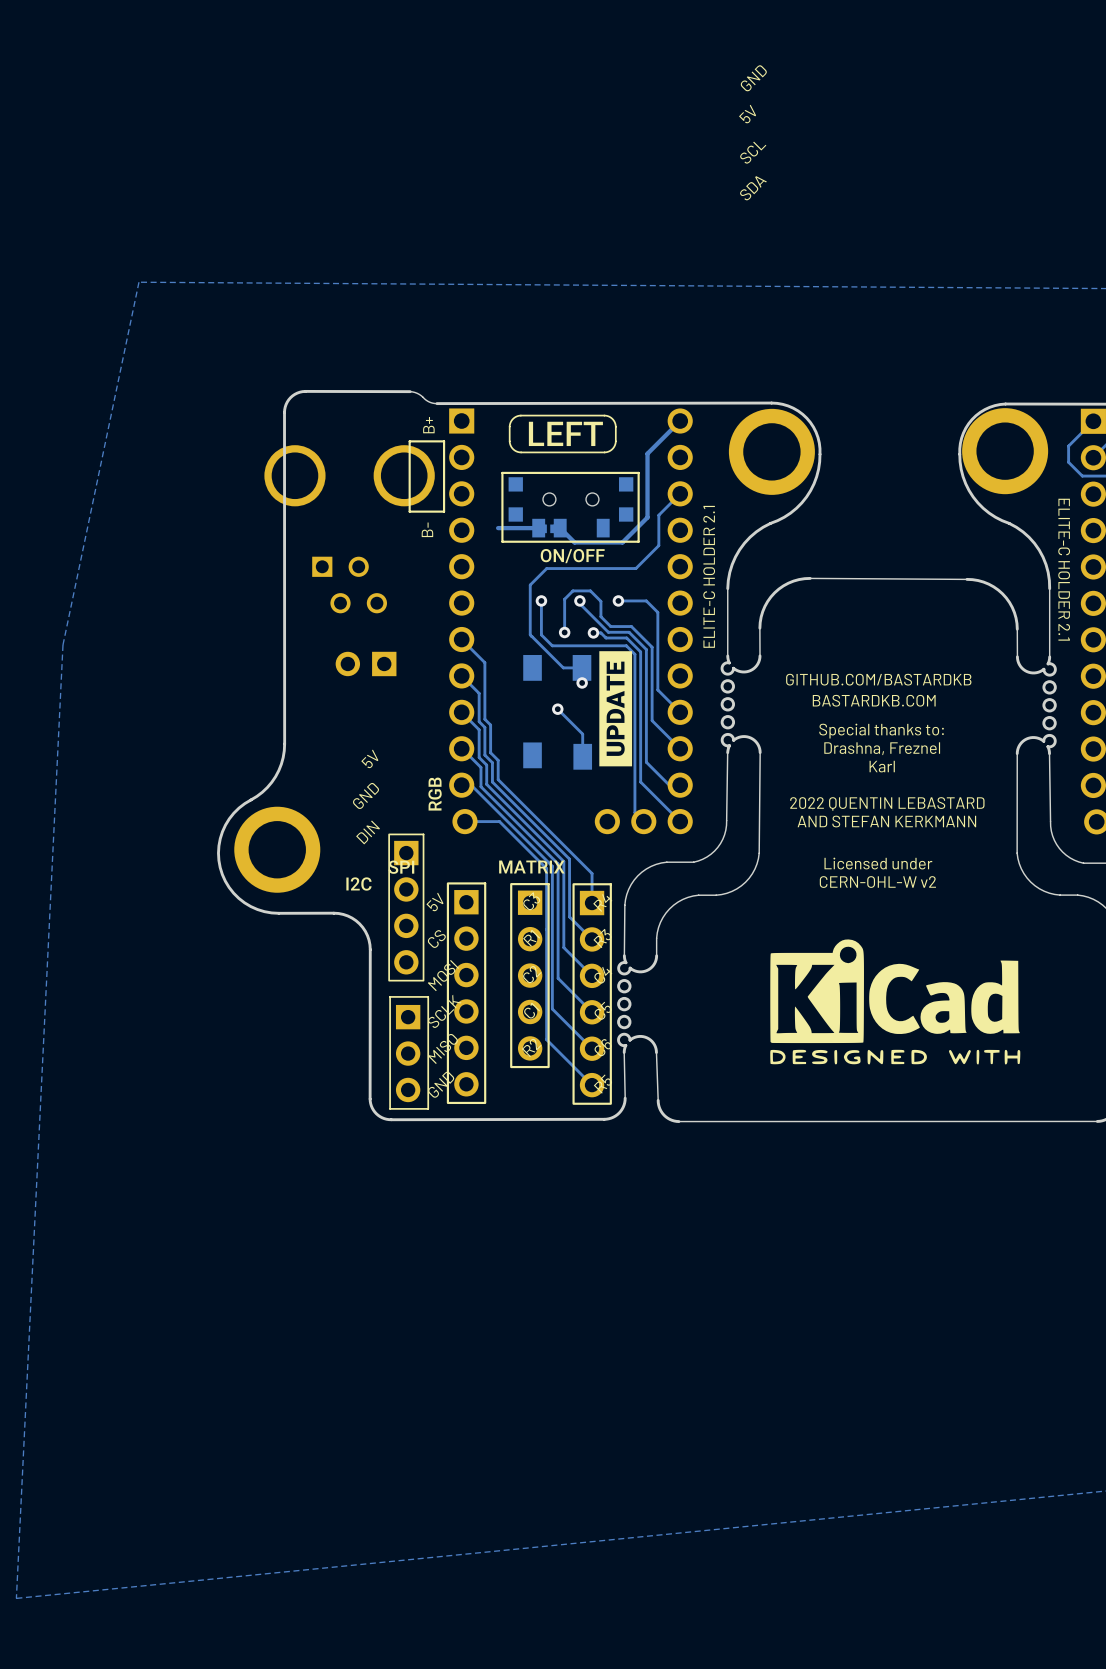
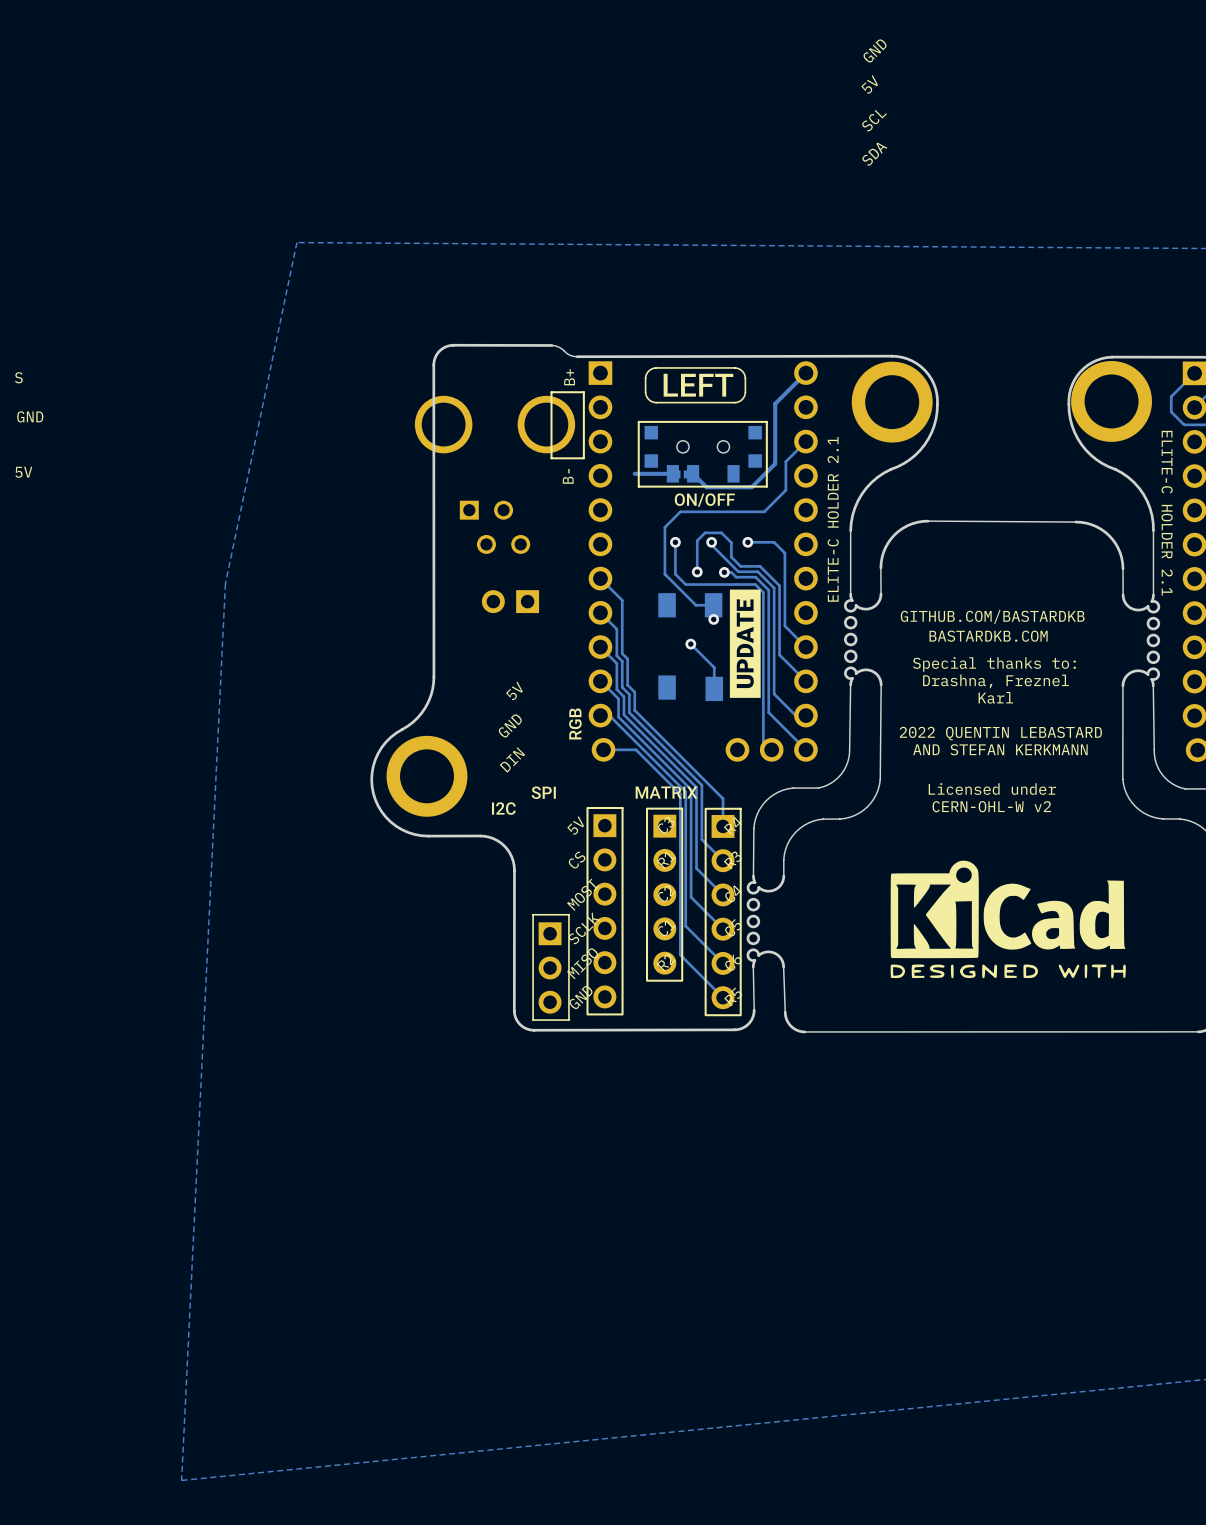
part: (406, 907) -> none

